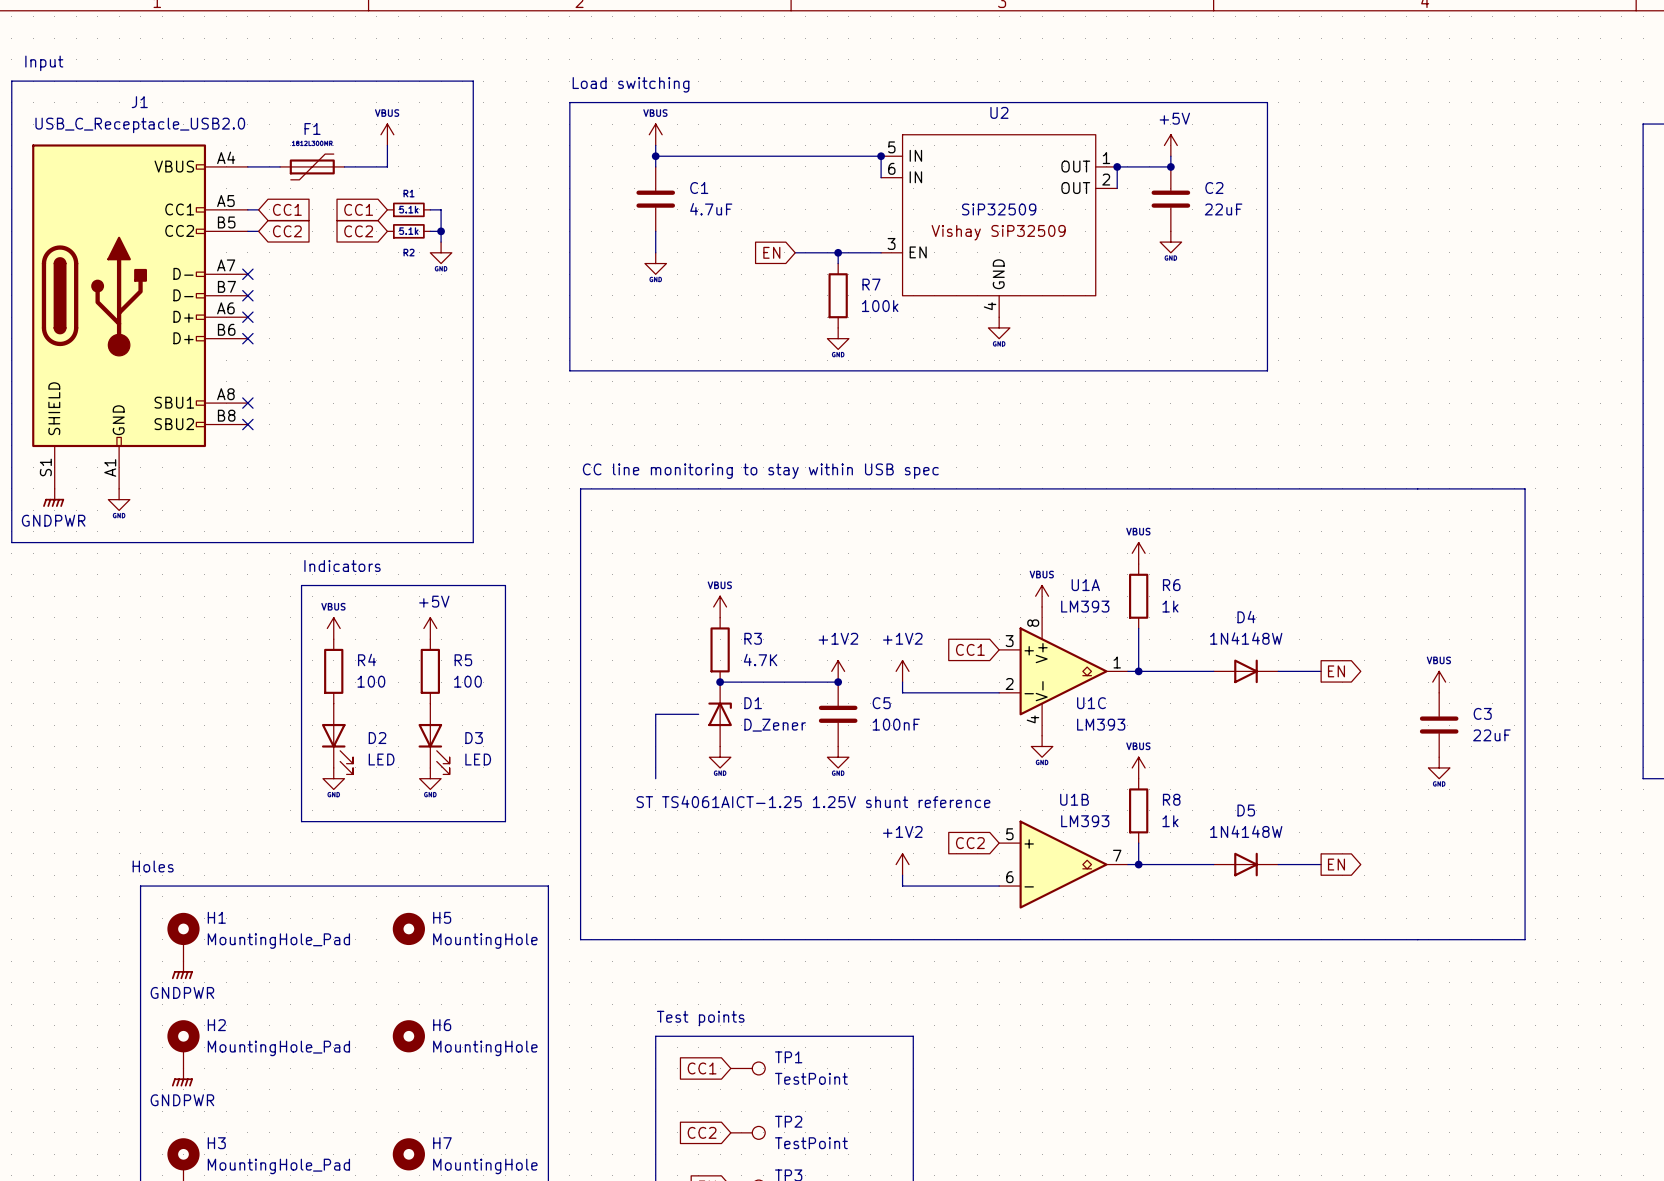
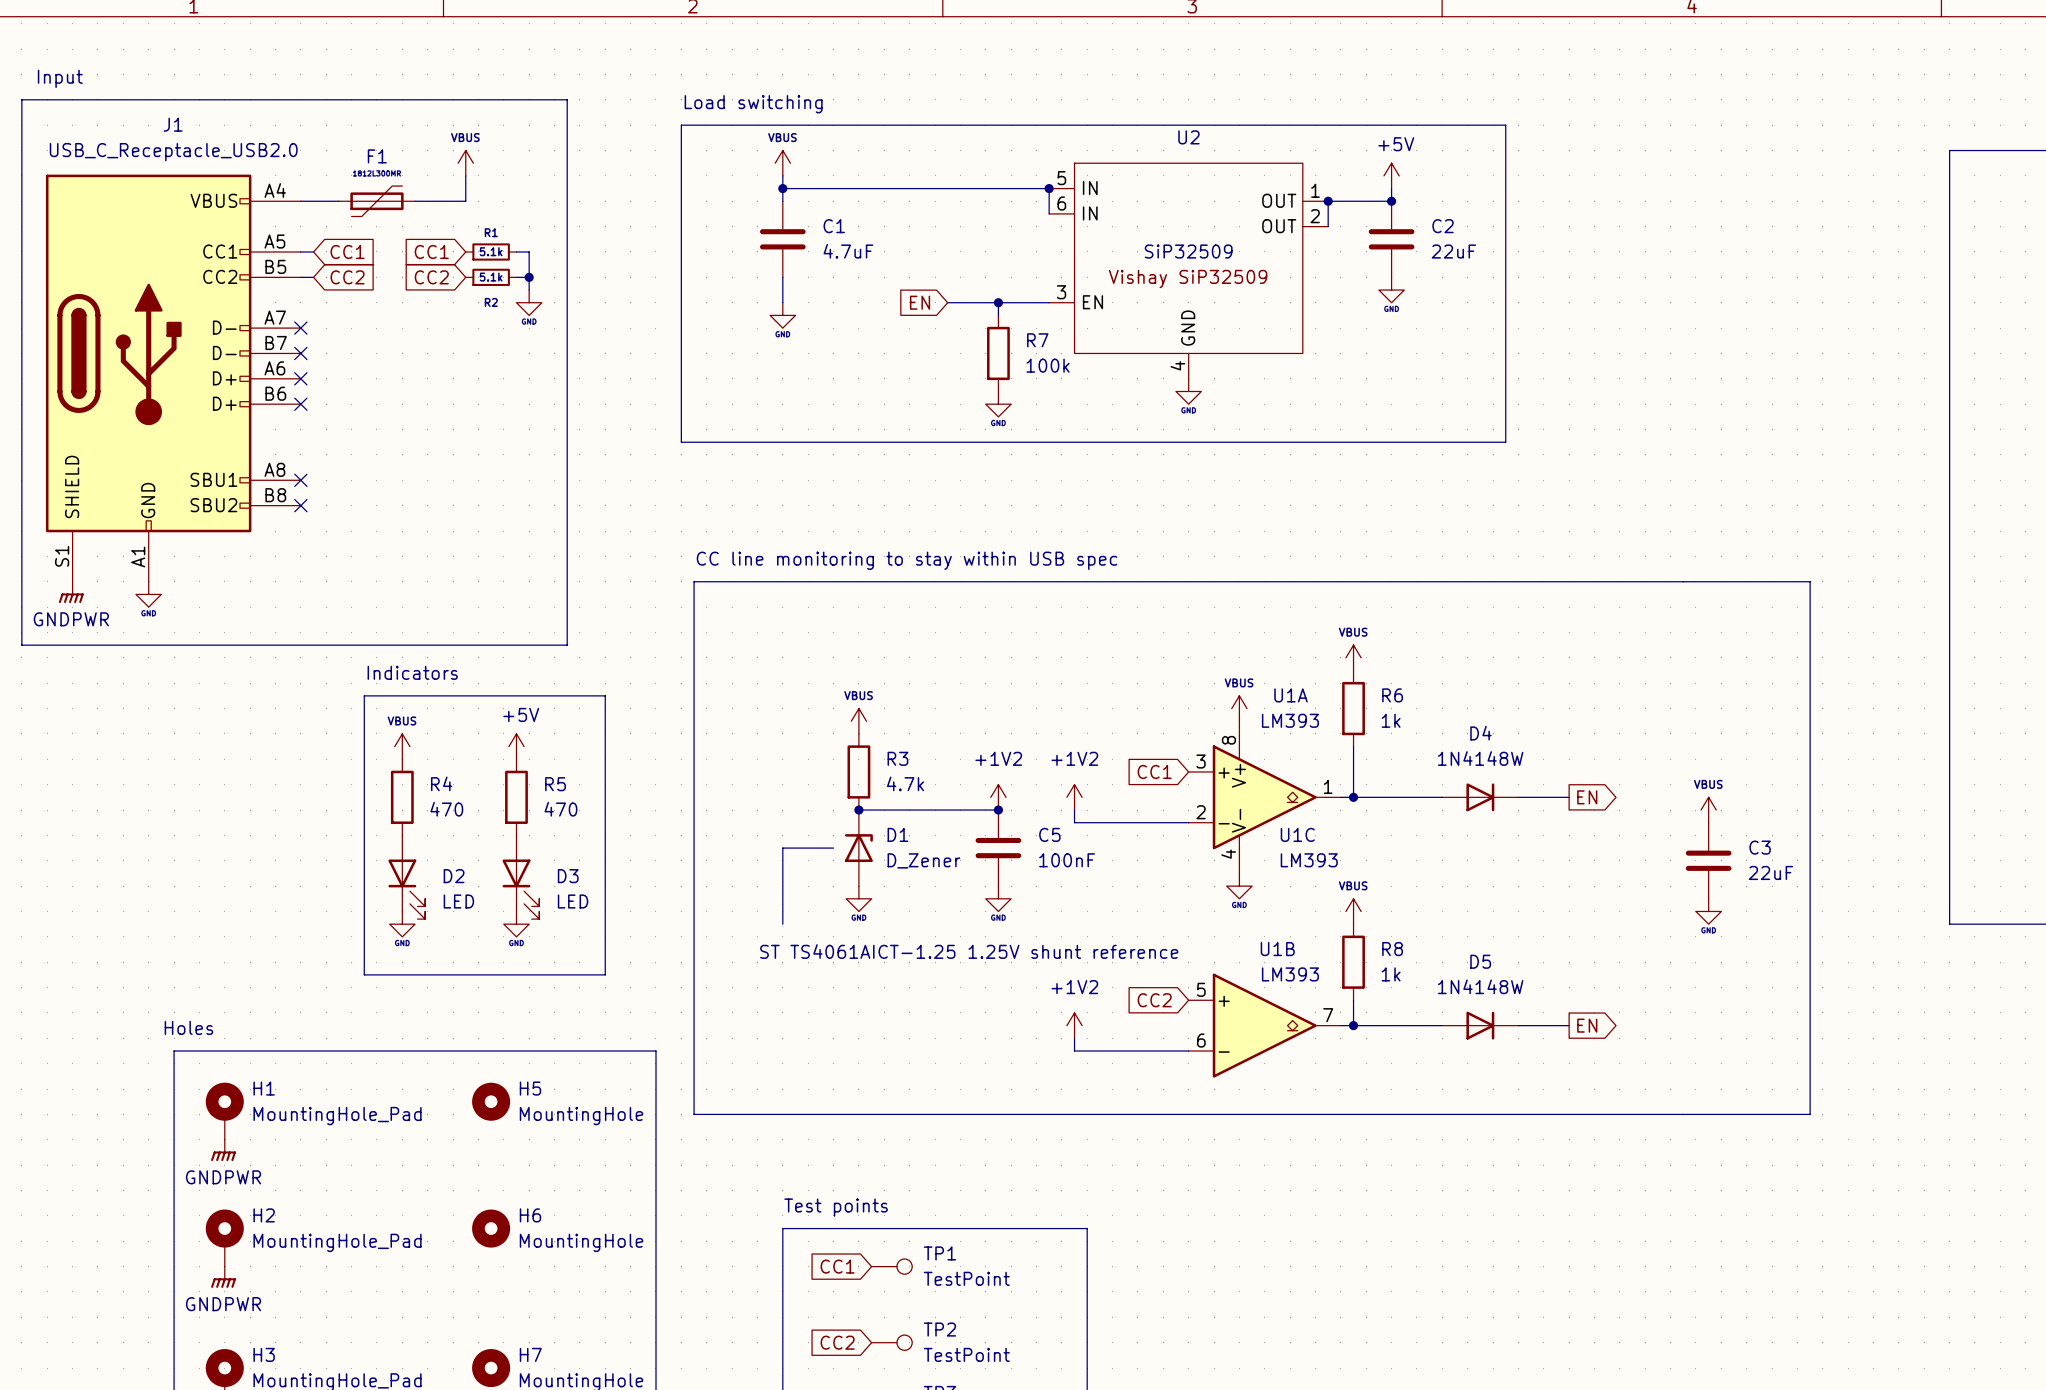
R3 value: 4.7K (760, 659) -> 4.7k (905, 783)
R4 value: 100 (371, 681) -> 470 (446, 809)
R5 value: 100 (467, 681) -> 470 (560, 809)

